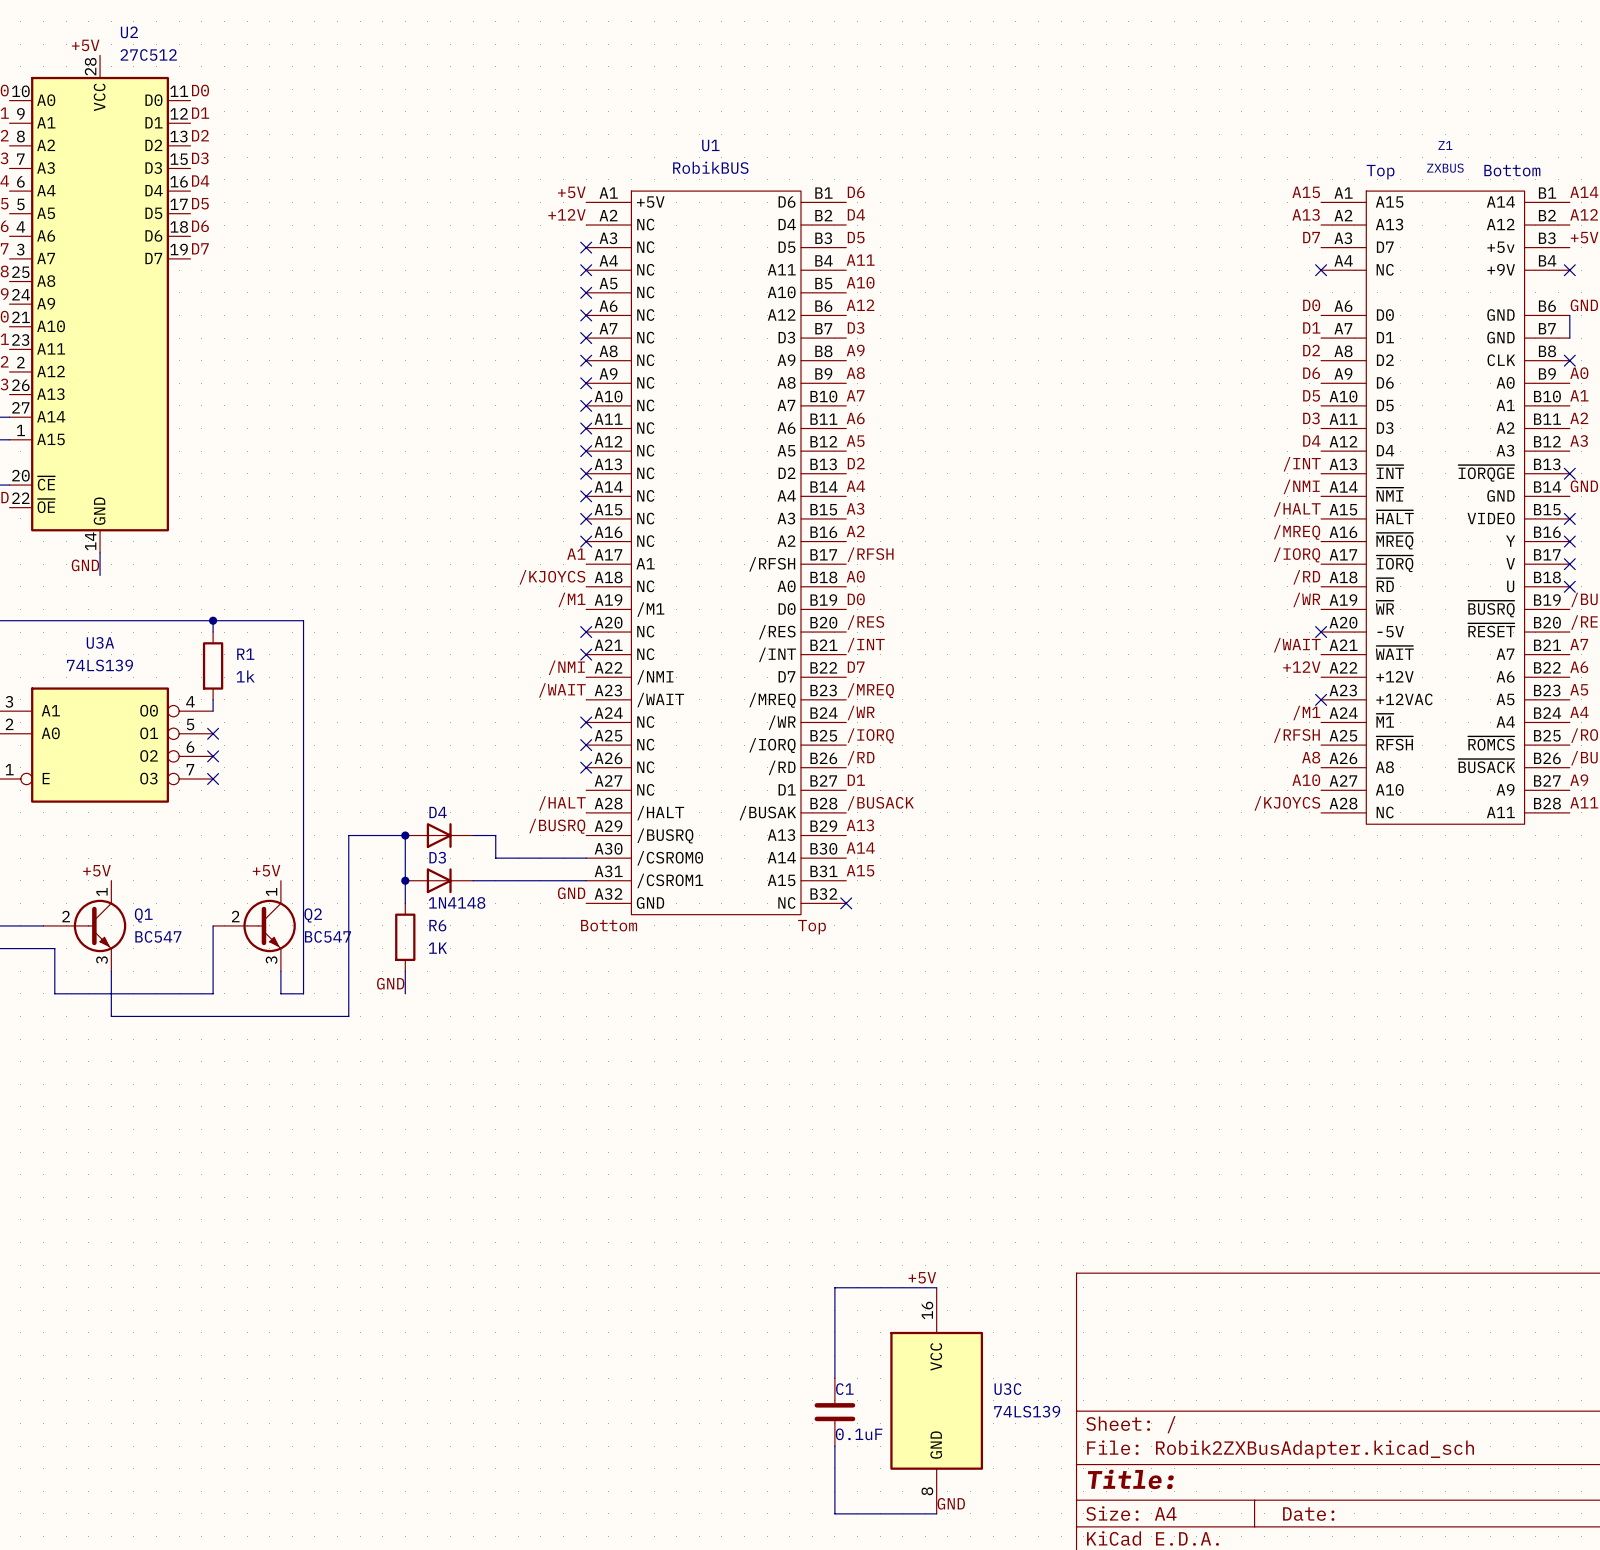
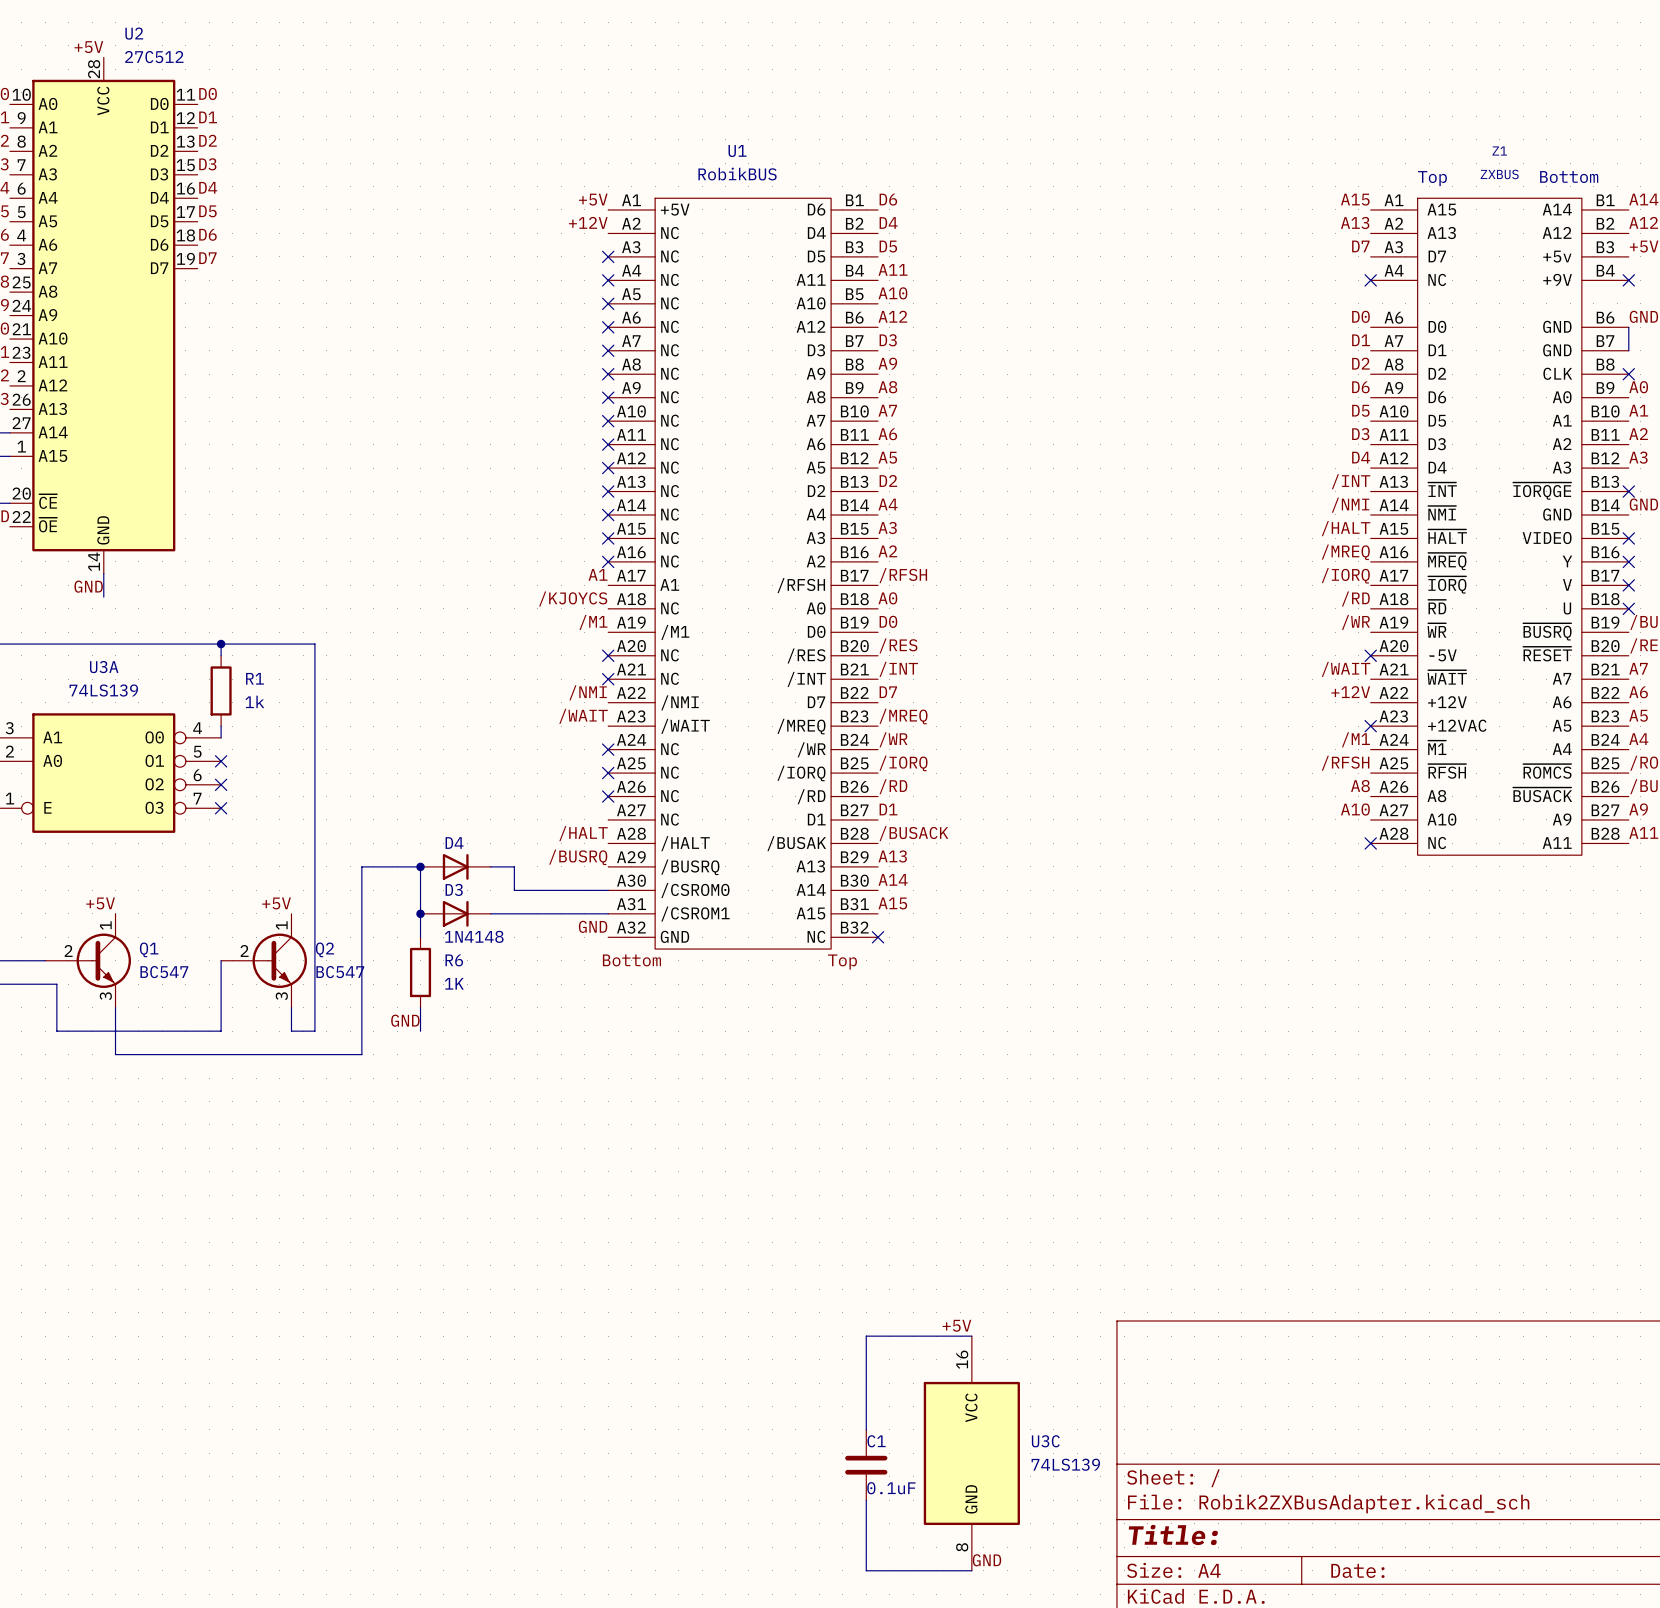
label: /KJOYCS (1287, 803) -> none
no-connect mark: none -> (1370, 843)

